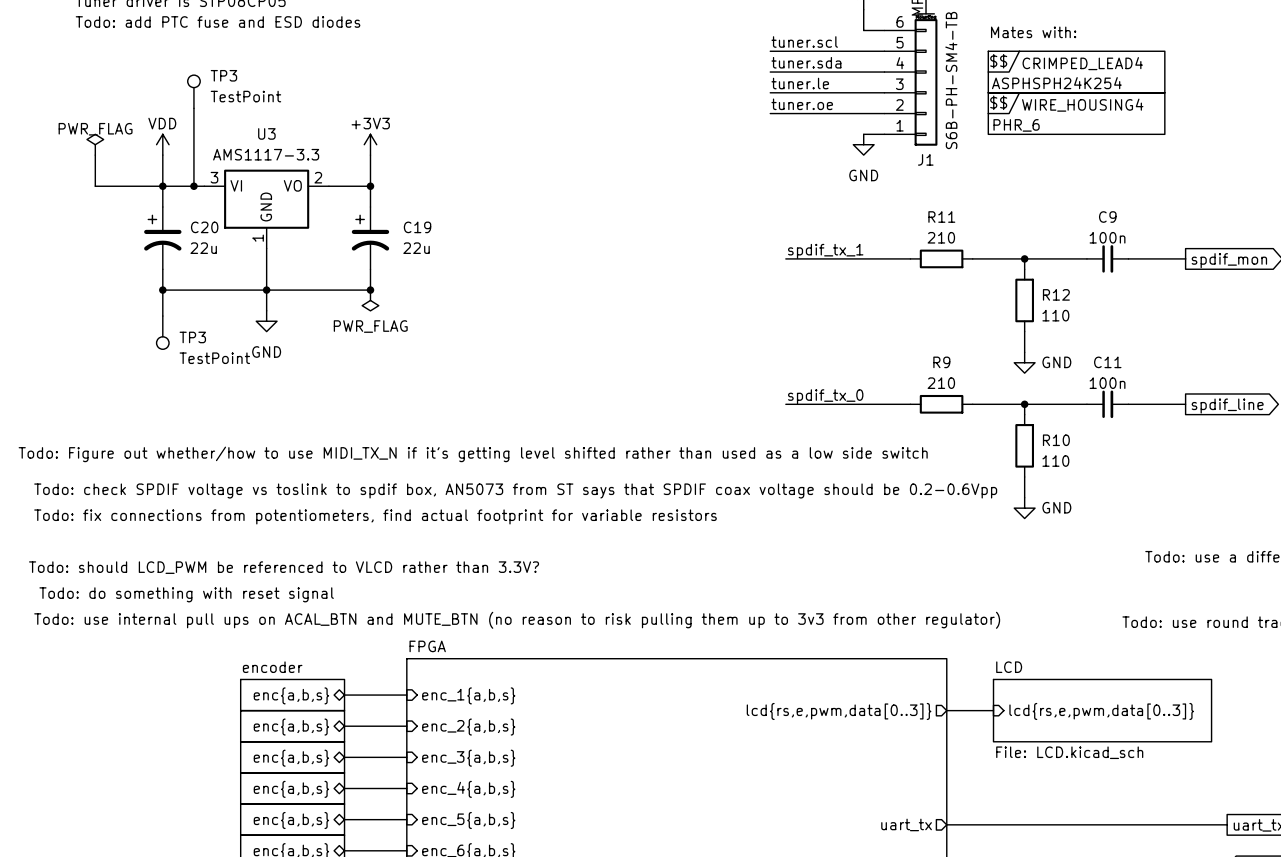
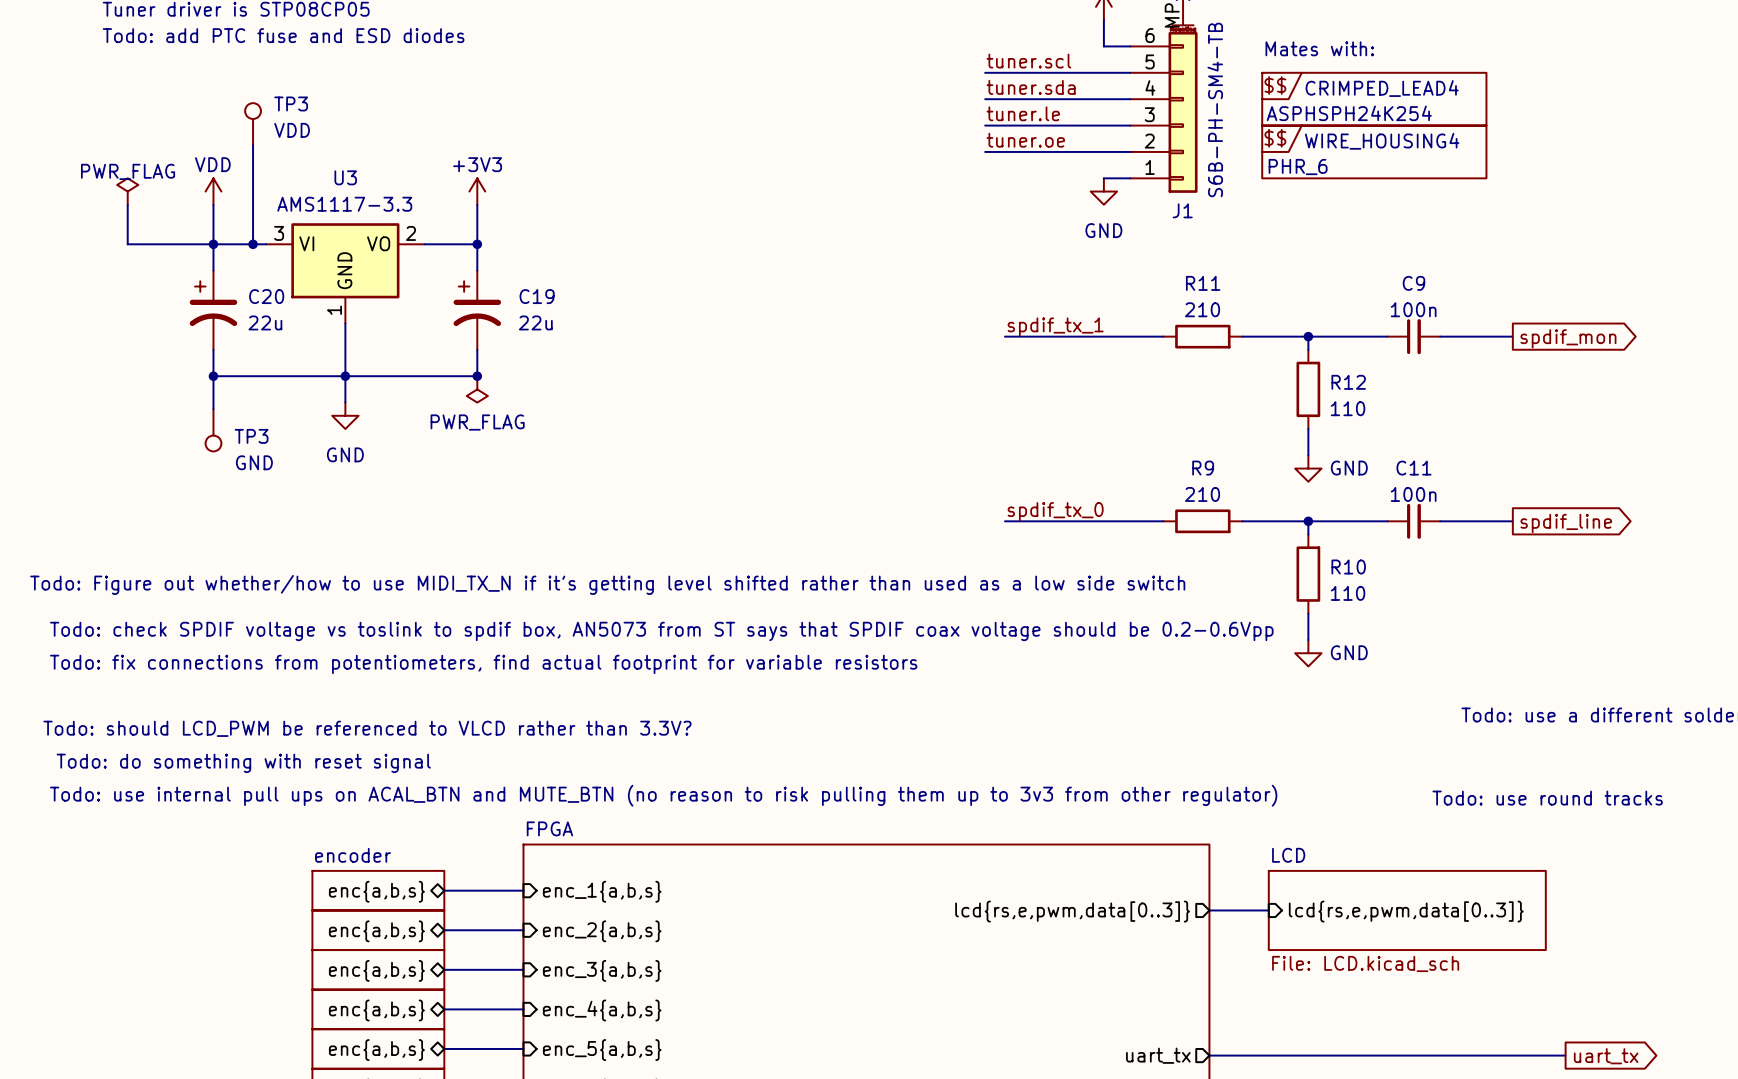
TP3 value: TestPoint (245, 96) -> VDD (292, 130)
TP3 value: TestPoint (214, 358) -> GND (254, 462)

